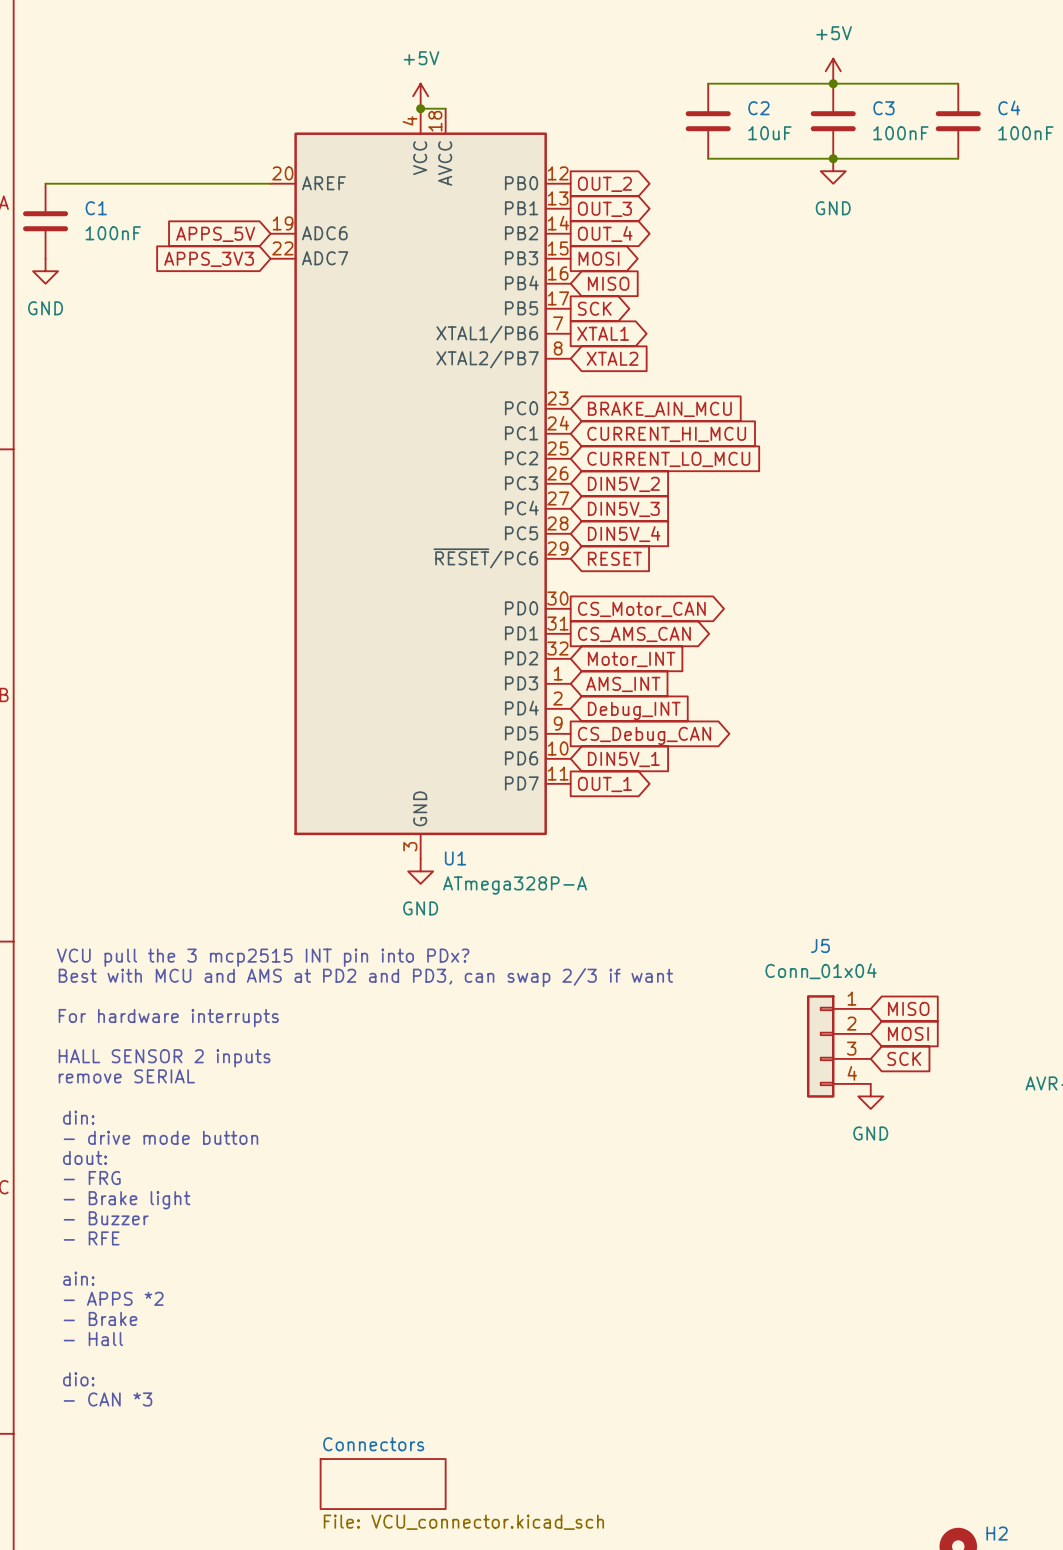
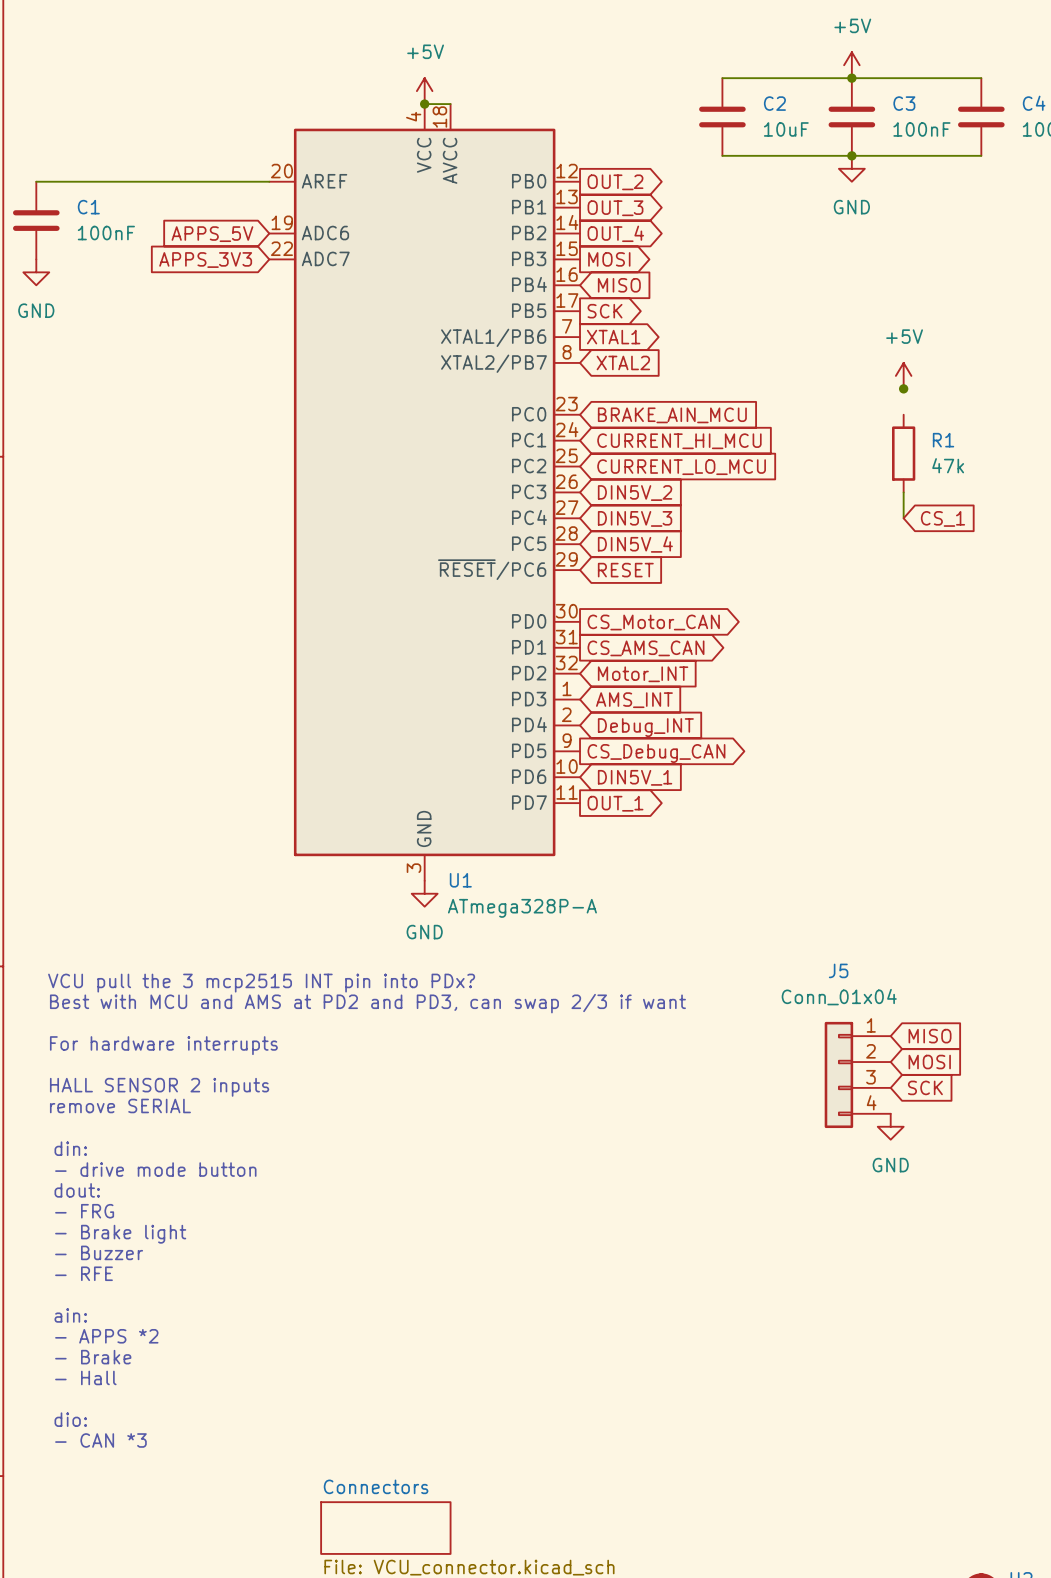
power symbol: none -> +5V (903, 375)
junction: none -> (903, 388)
R1: none -> 47k (903, 453)
wire: none -> (903, 492) (903, 518)
global label: none -> CS_1 (942, 518)

